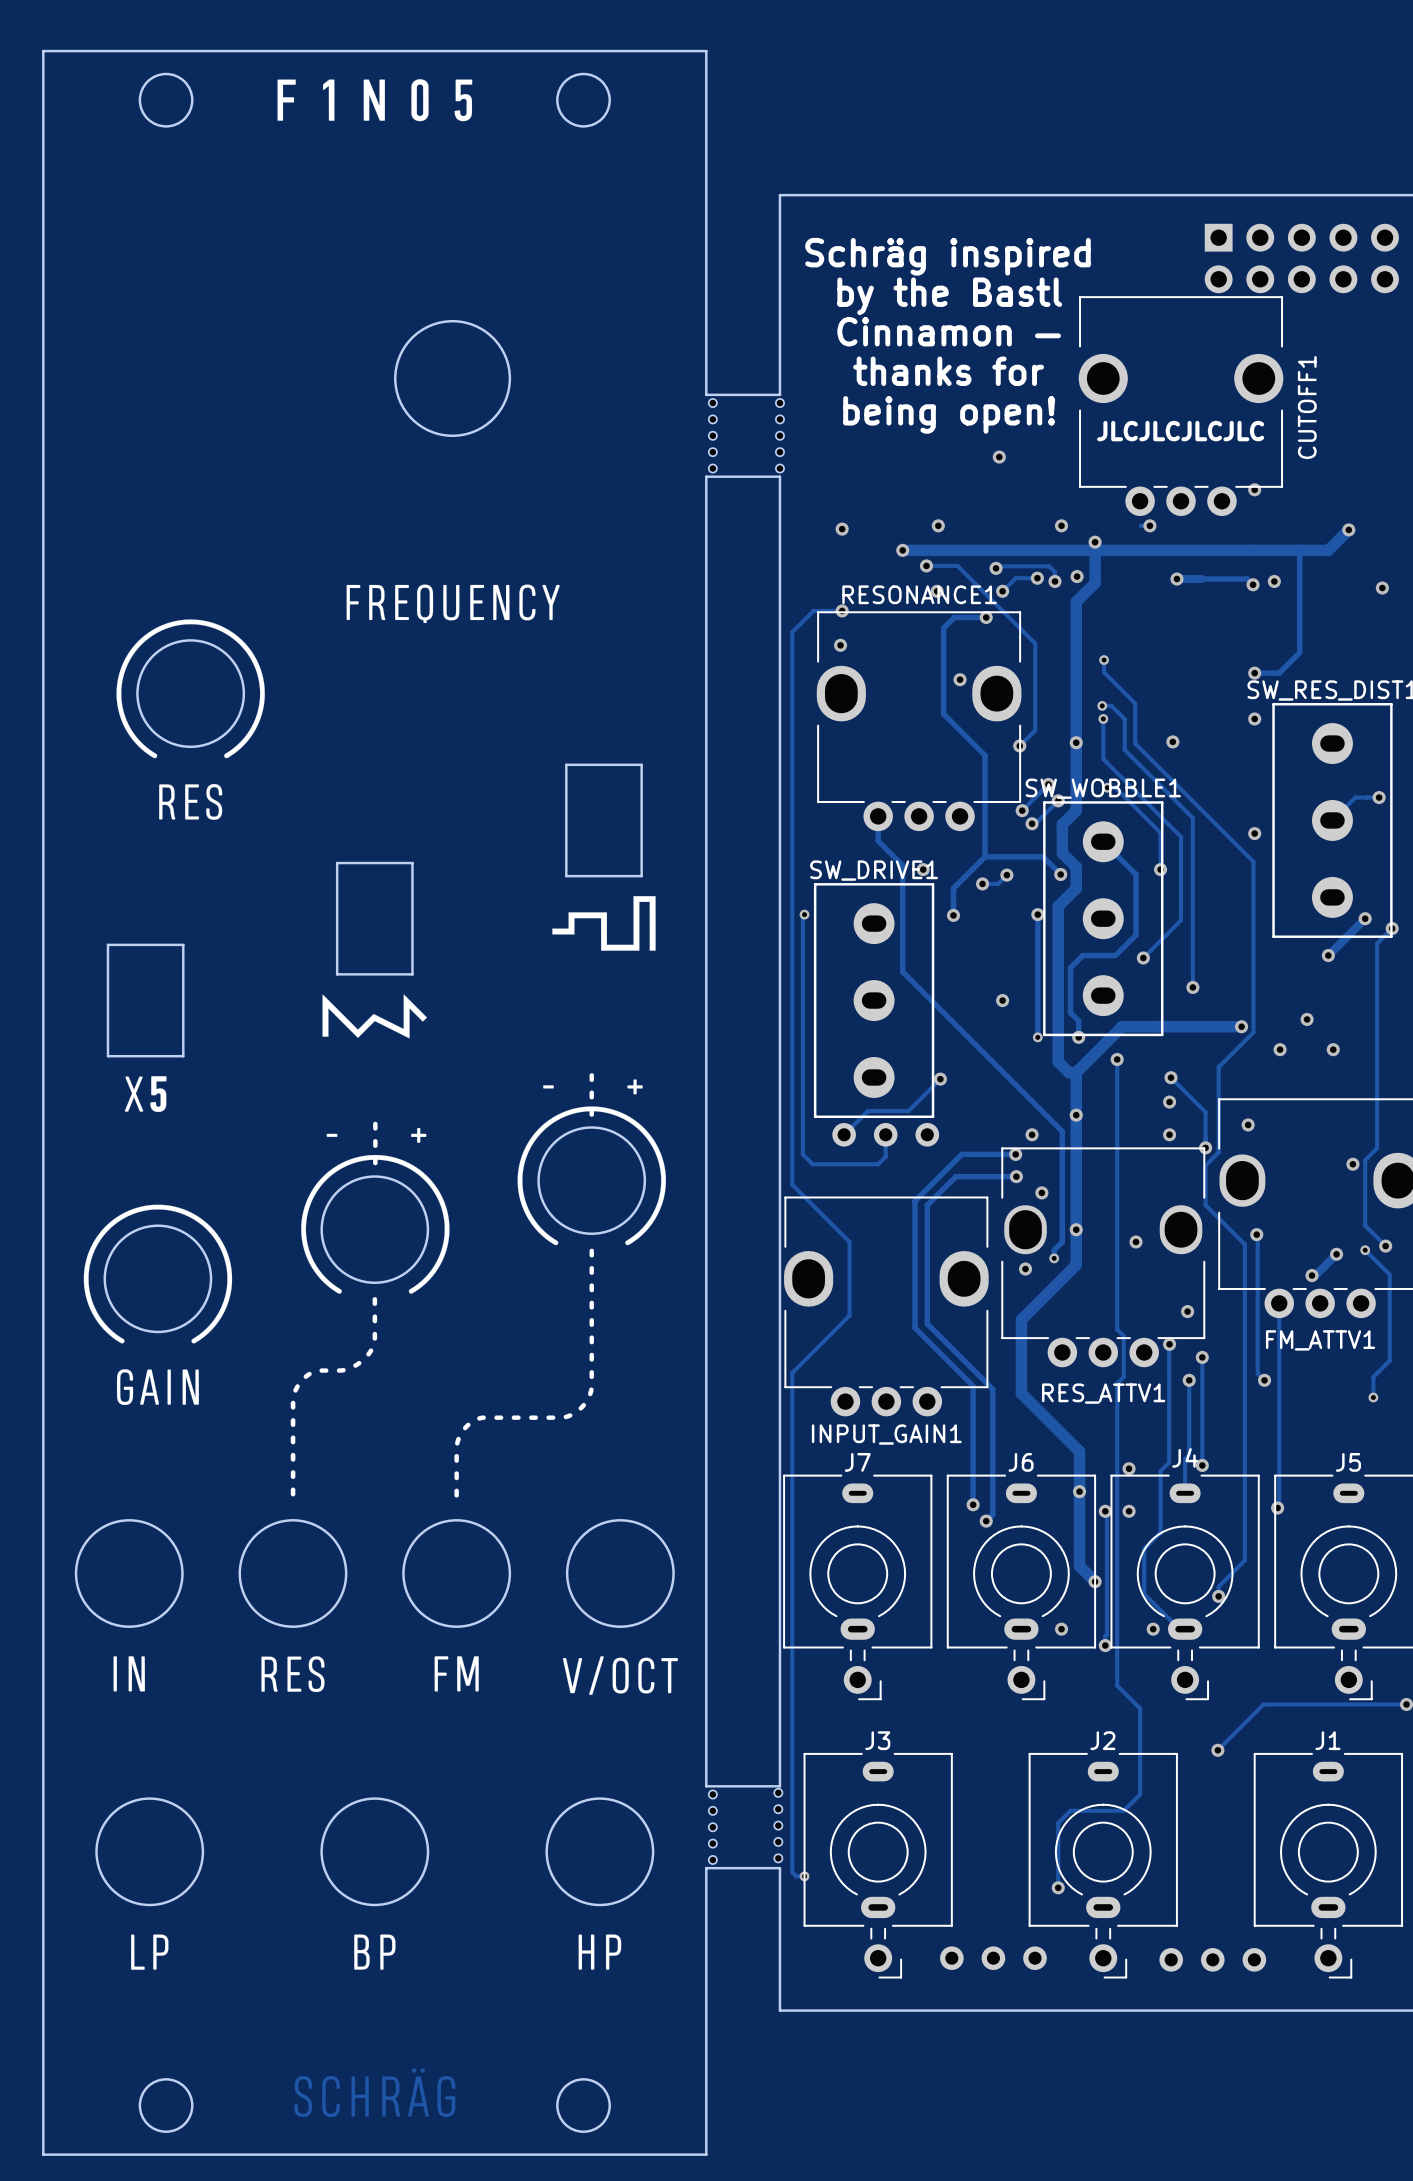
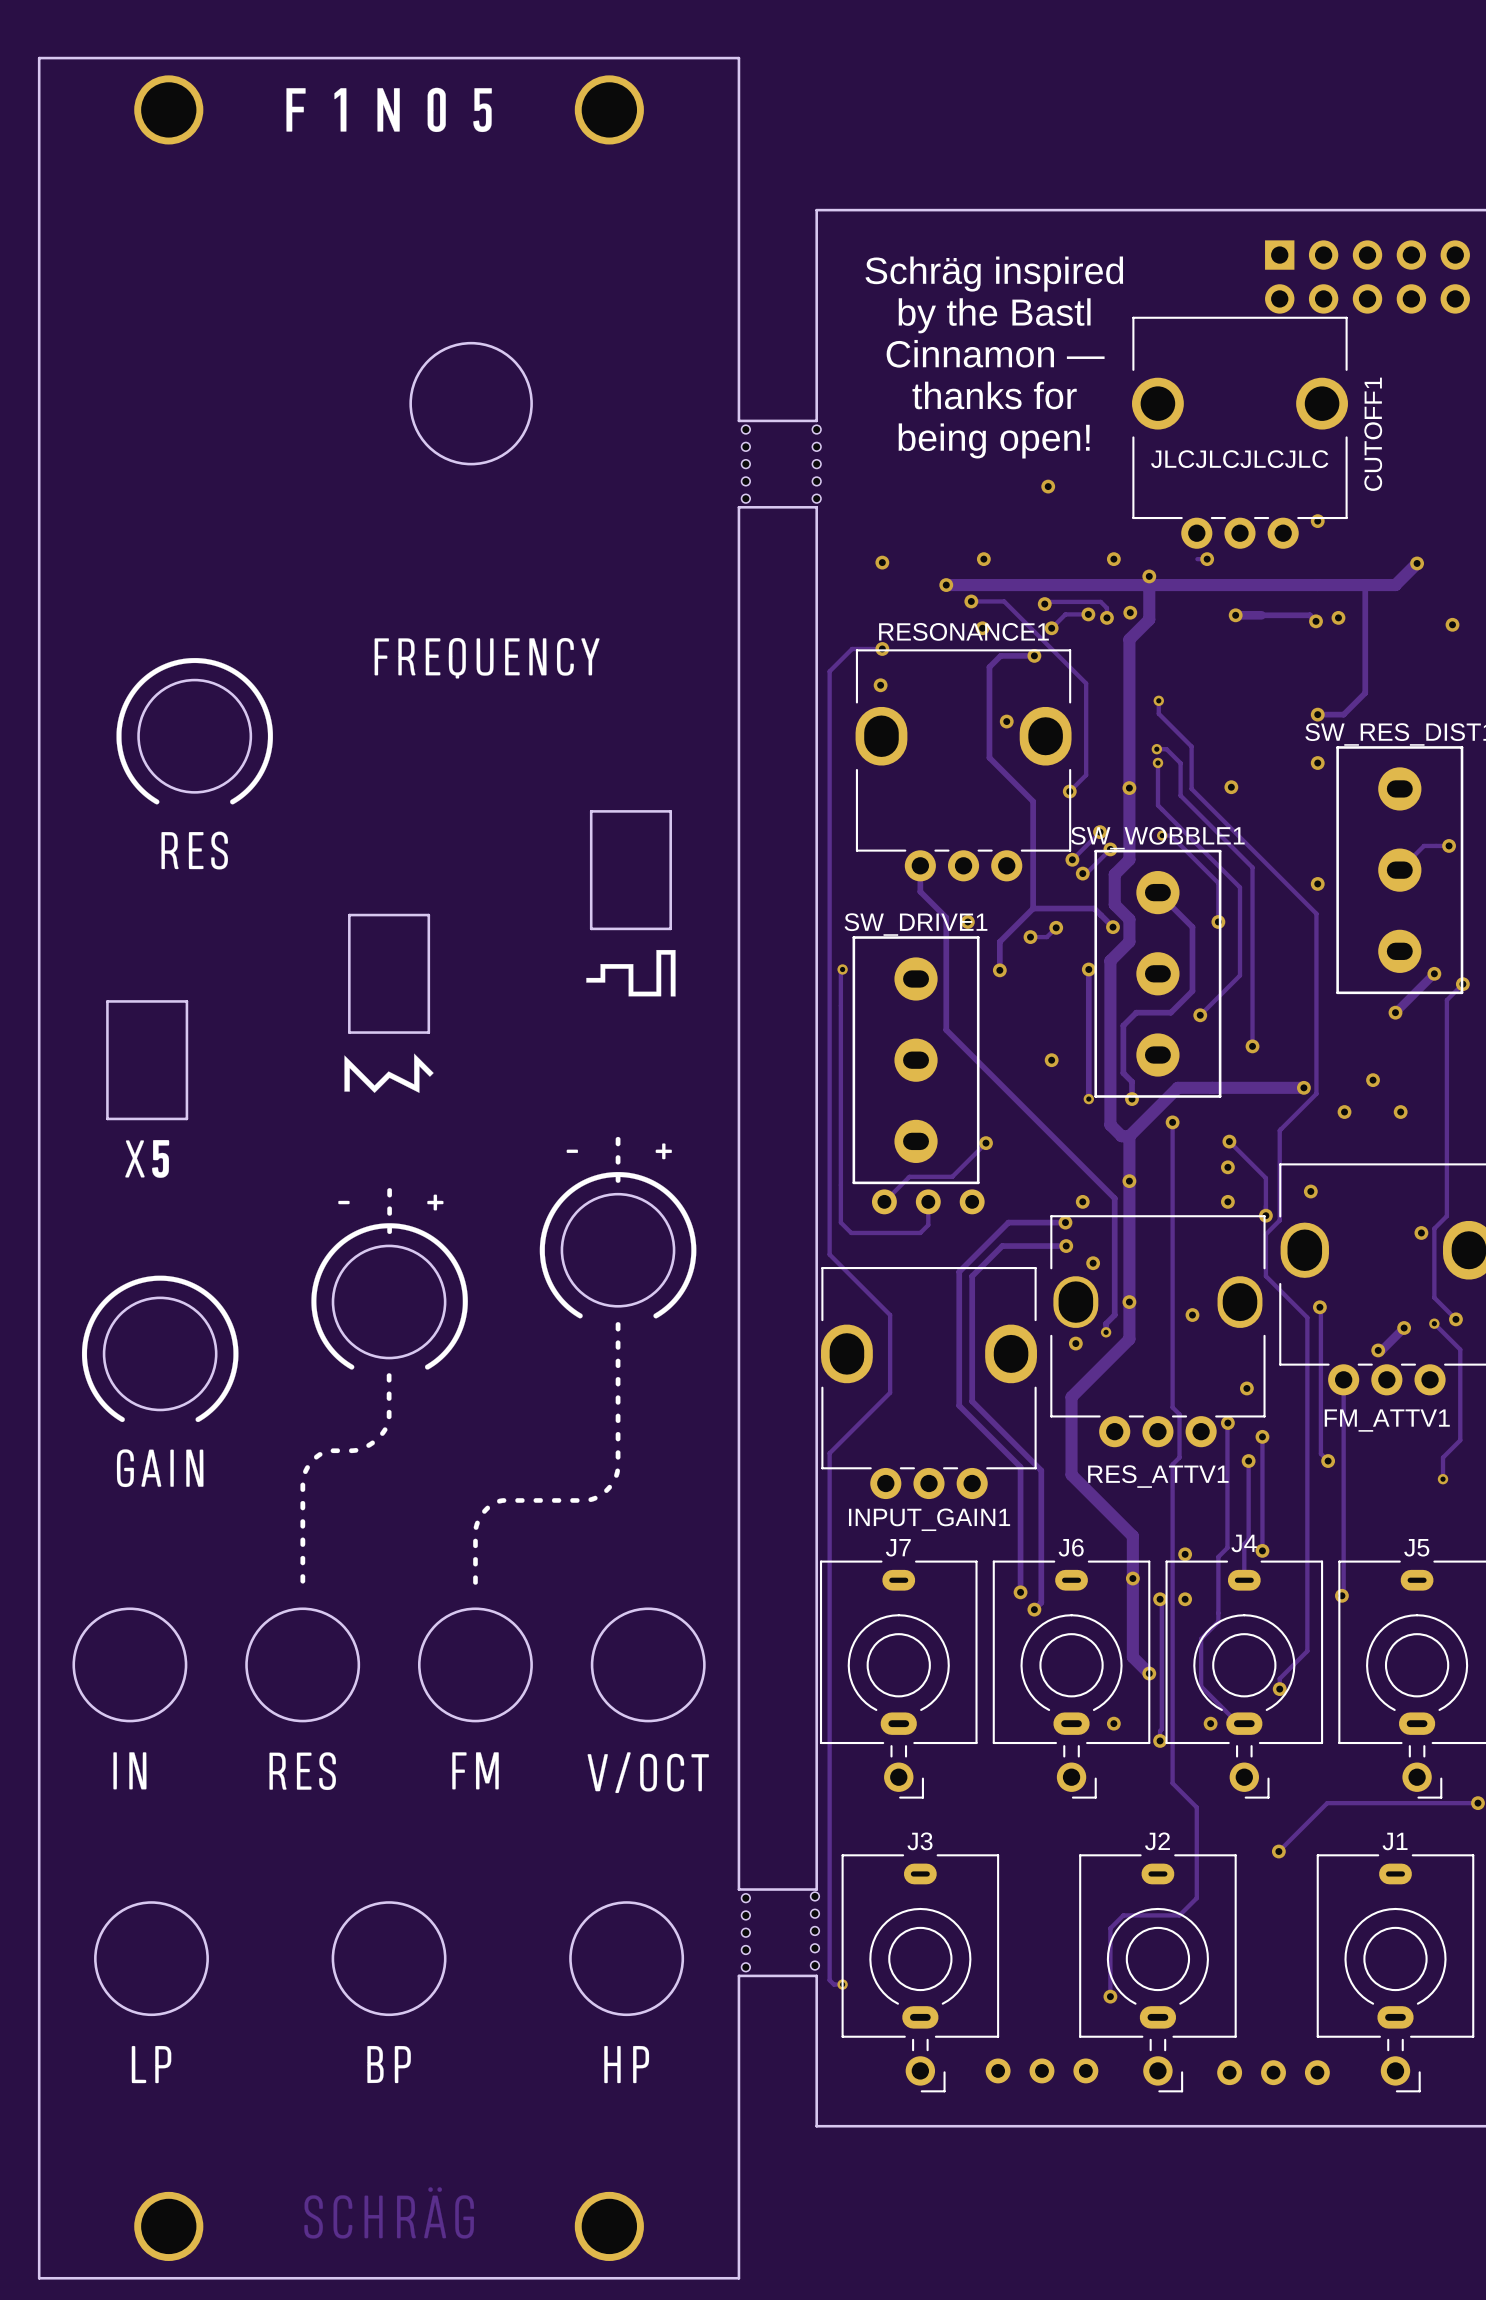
round board edge: [138, 72, 194, 128] -> none
round board edge: [556, 72, 611, 128] -> none
drawing shape: [83, 79, 678, 1970] -> [81, 87, 709, 2084]
part: none -> (168, 109)
part: none -> (609, 109)
round board edge: [138, 2078, 194, 2133] -> none
round board edge: [556, 2078, 611, 2133] -> none
part: none -> (168, 2226)
part: none -> (609, 2226)

